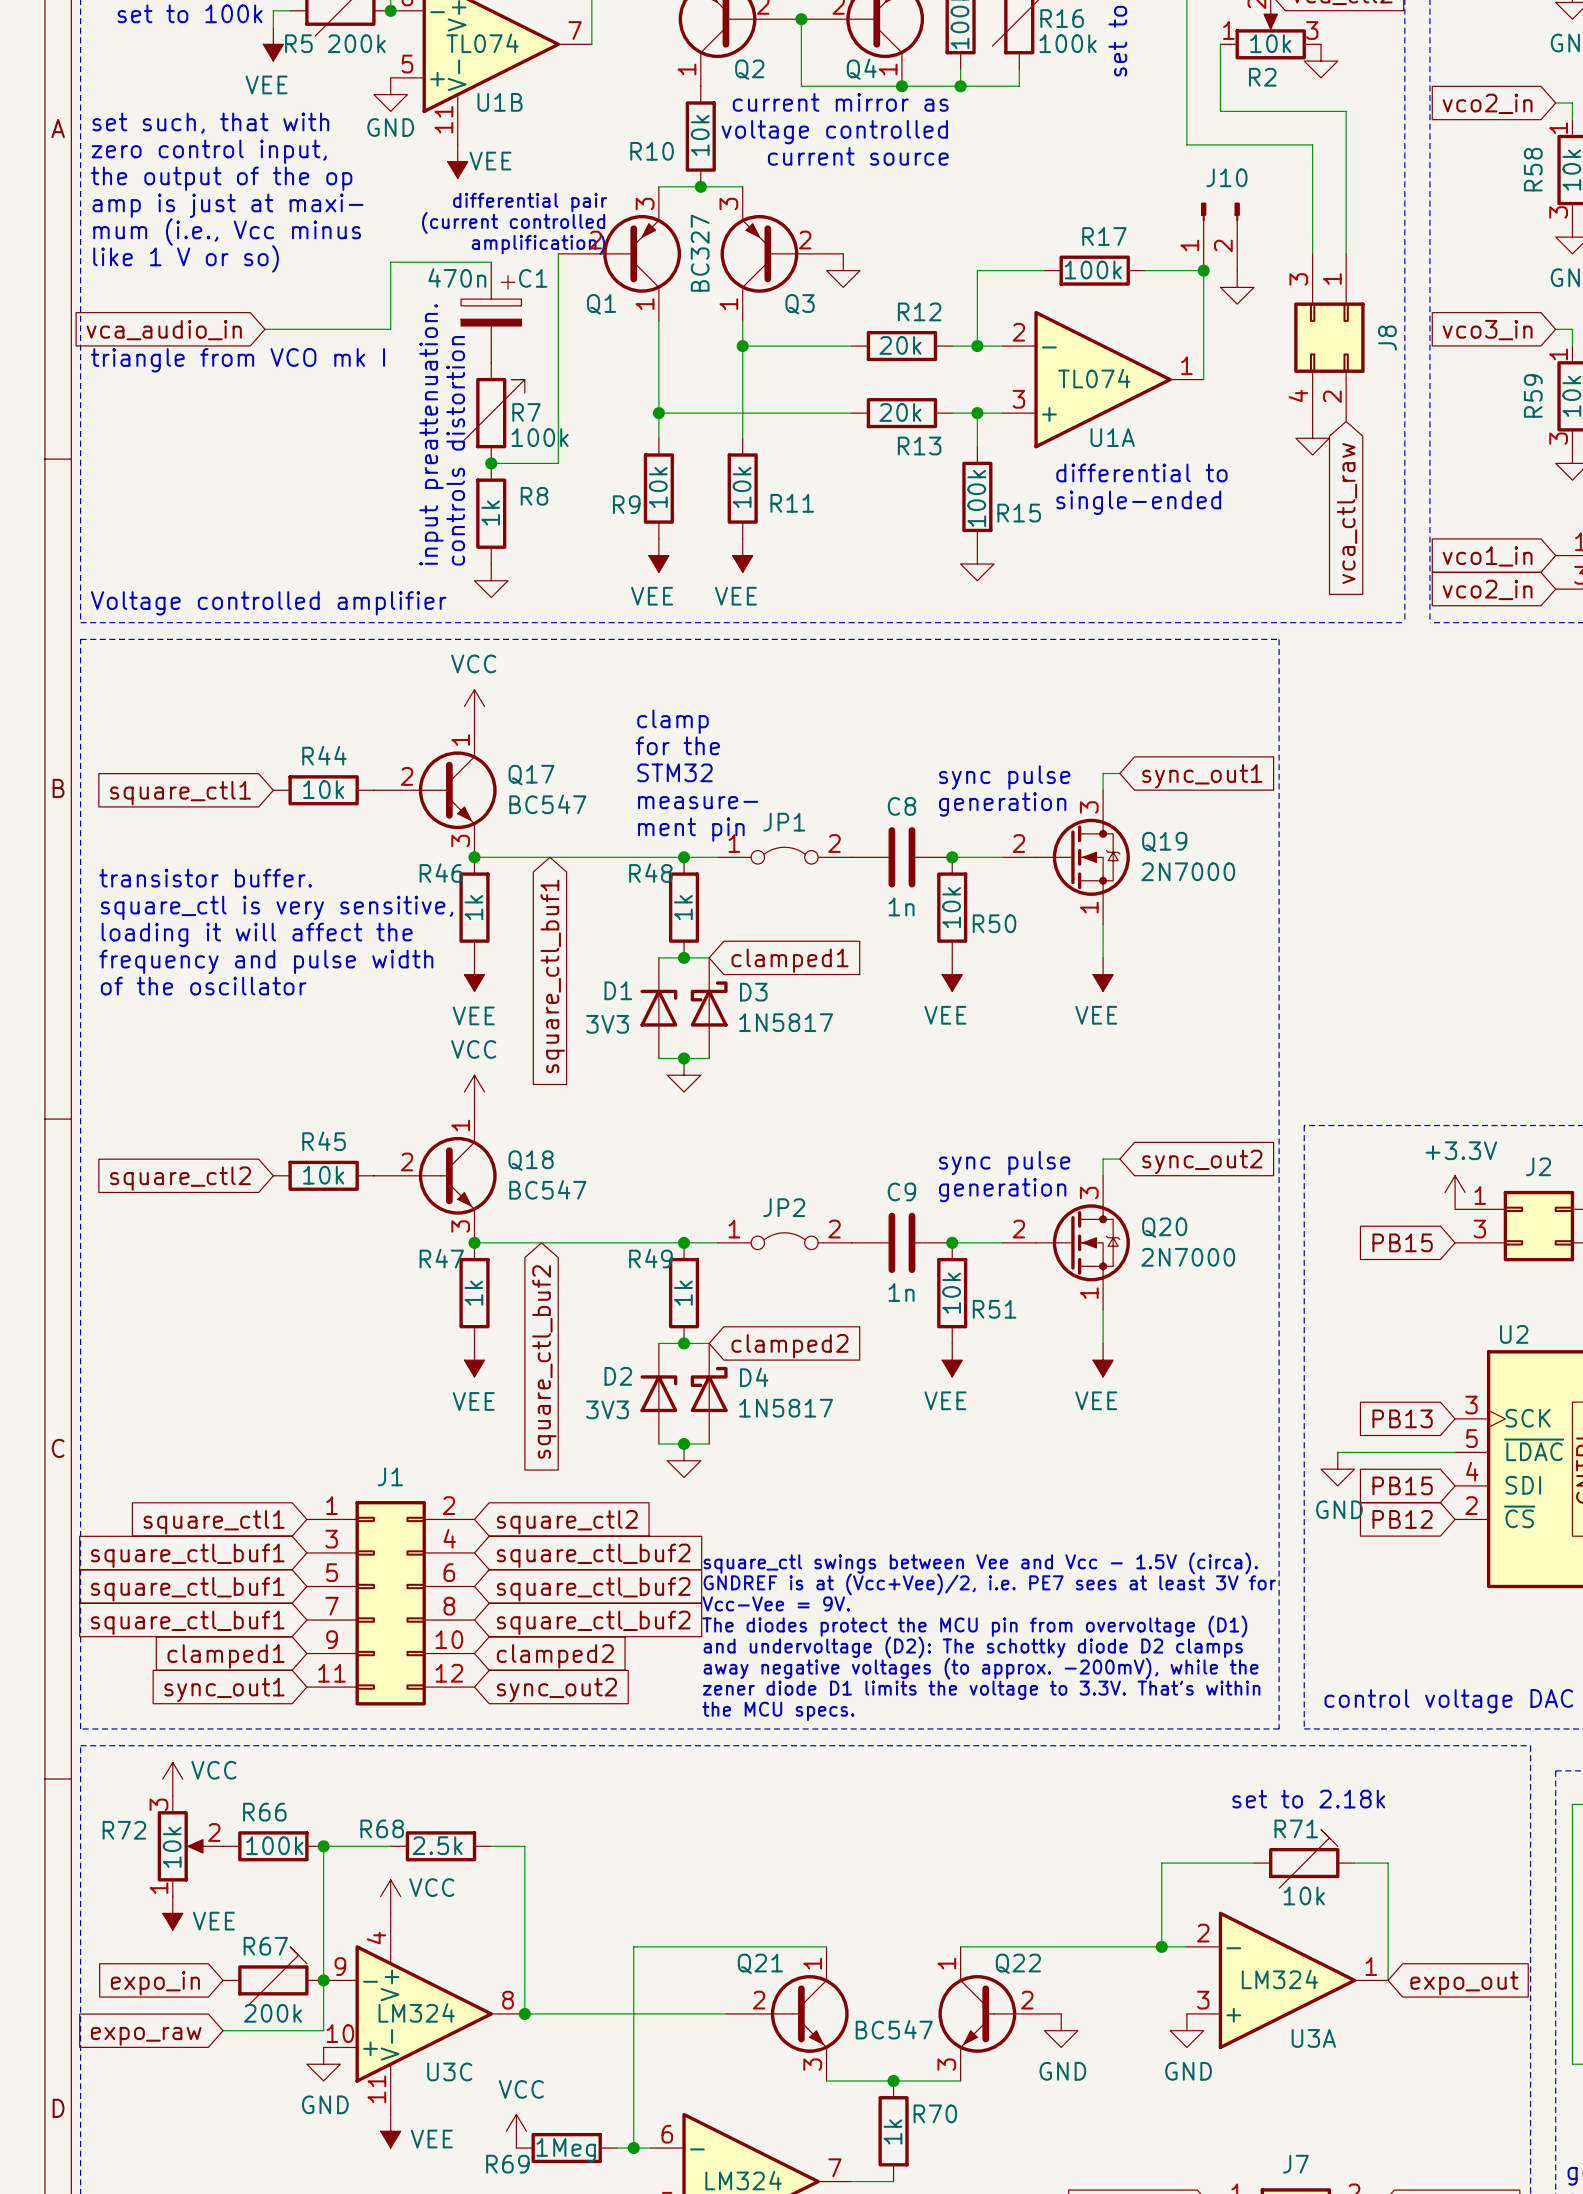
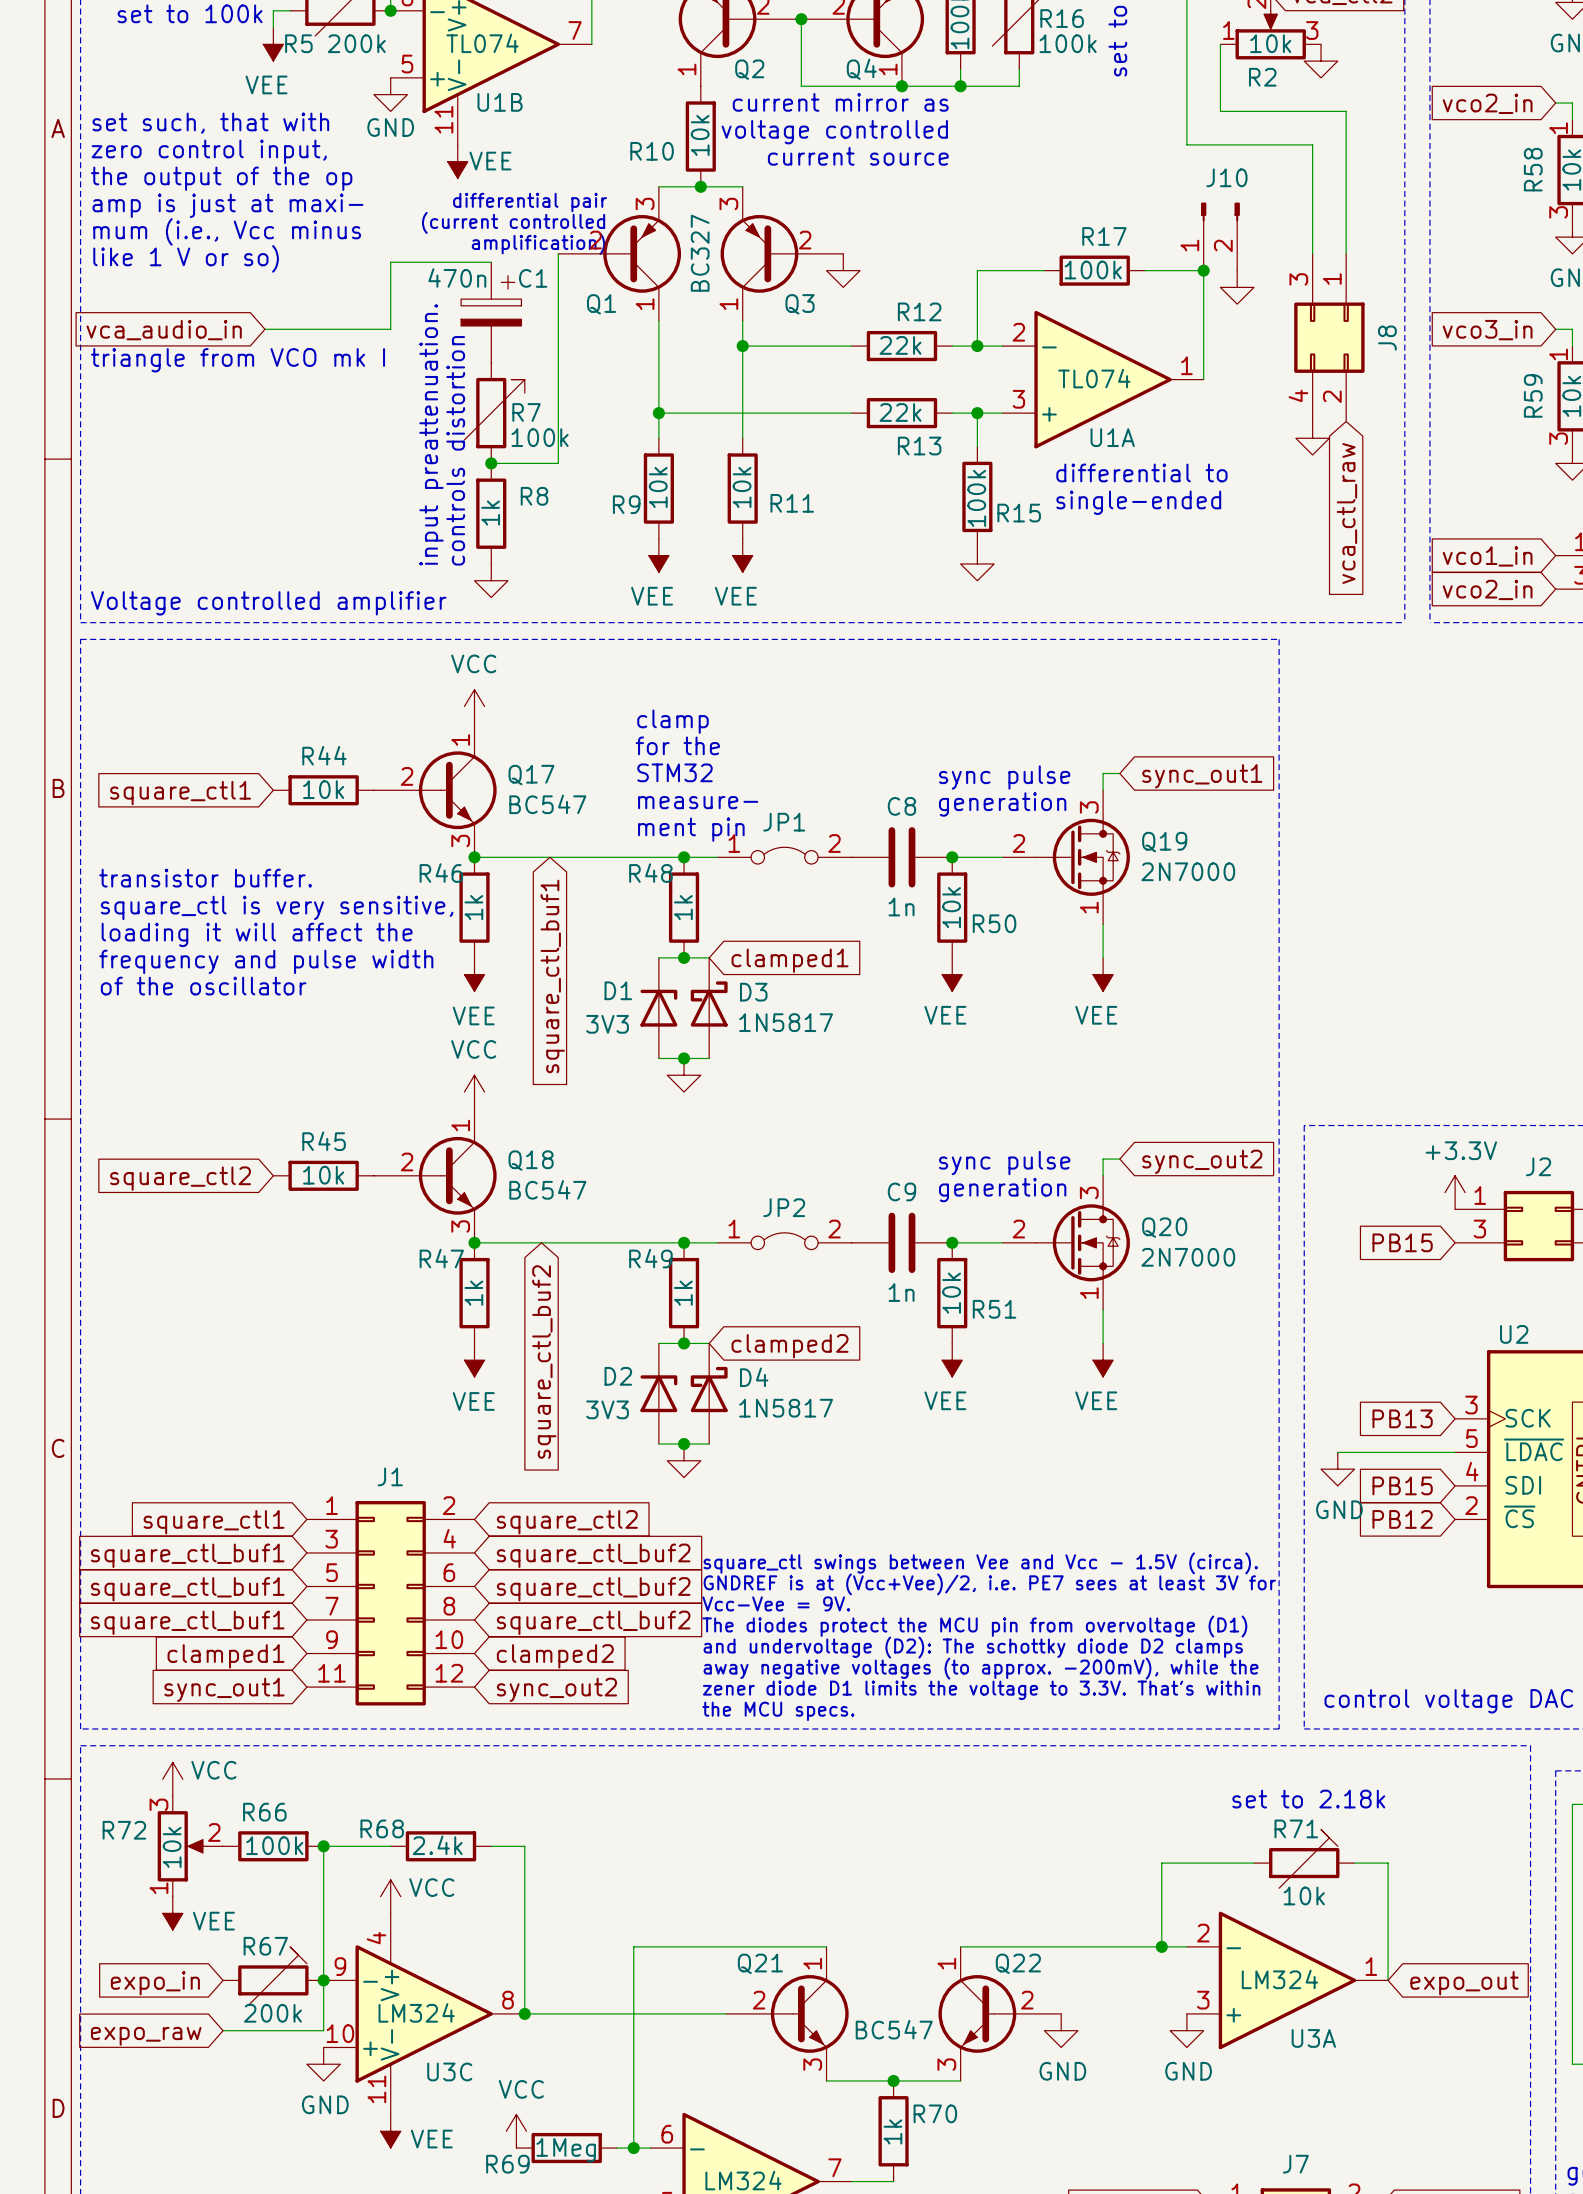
R12 value: 20k (900, 345) -> 22k (900, 345)
R13 value: 20k (900, 412) -> 22k (900, 412)
R68 value: 2.5k (437, 1845) -> 2.4k (437, 1845)

